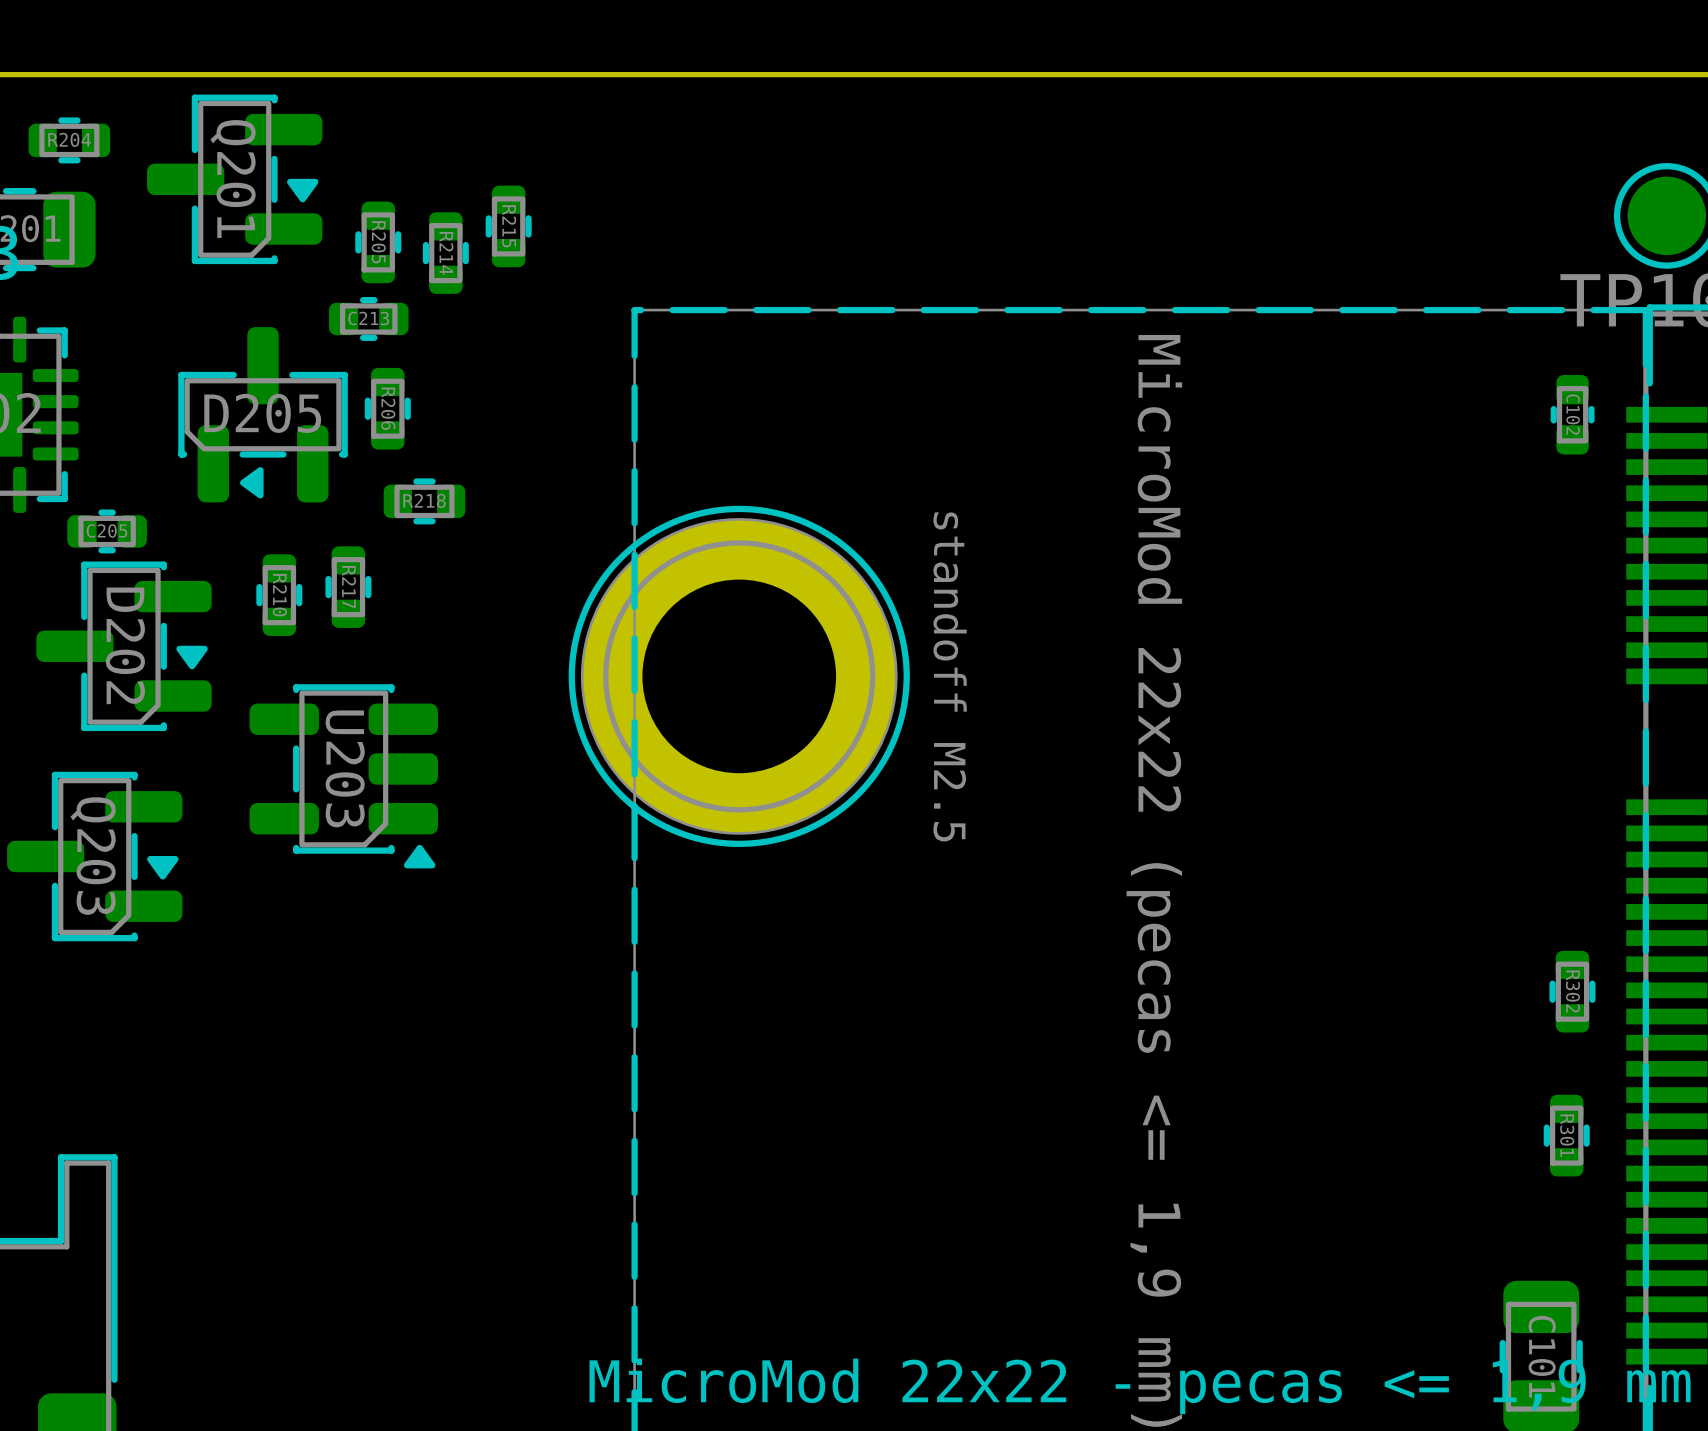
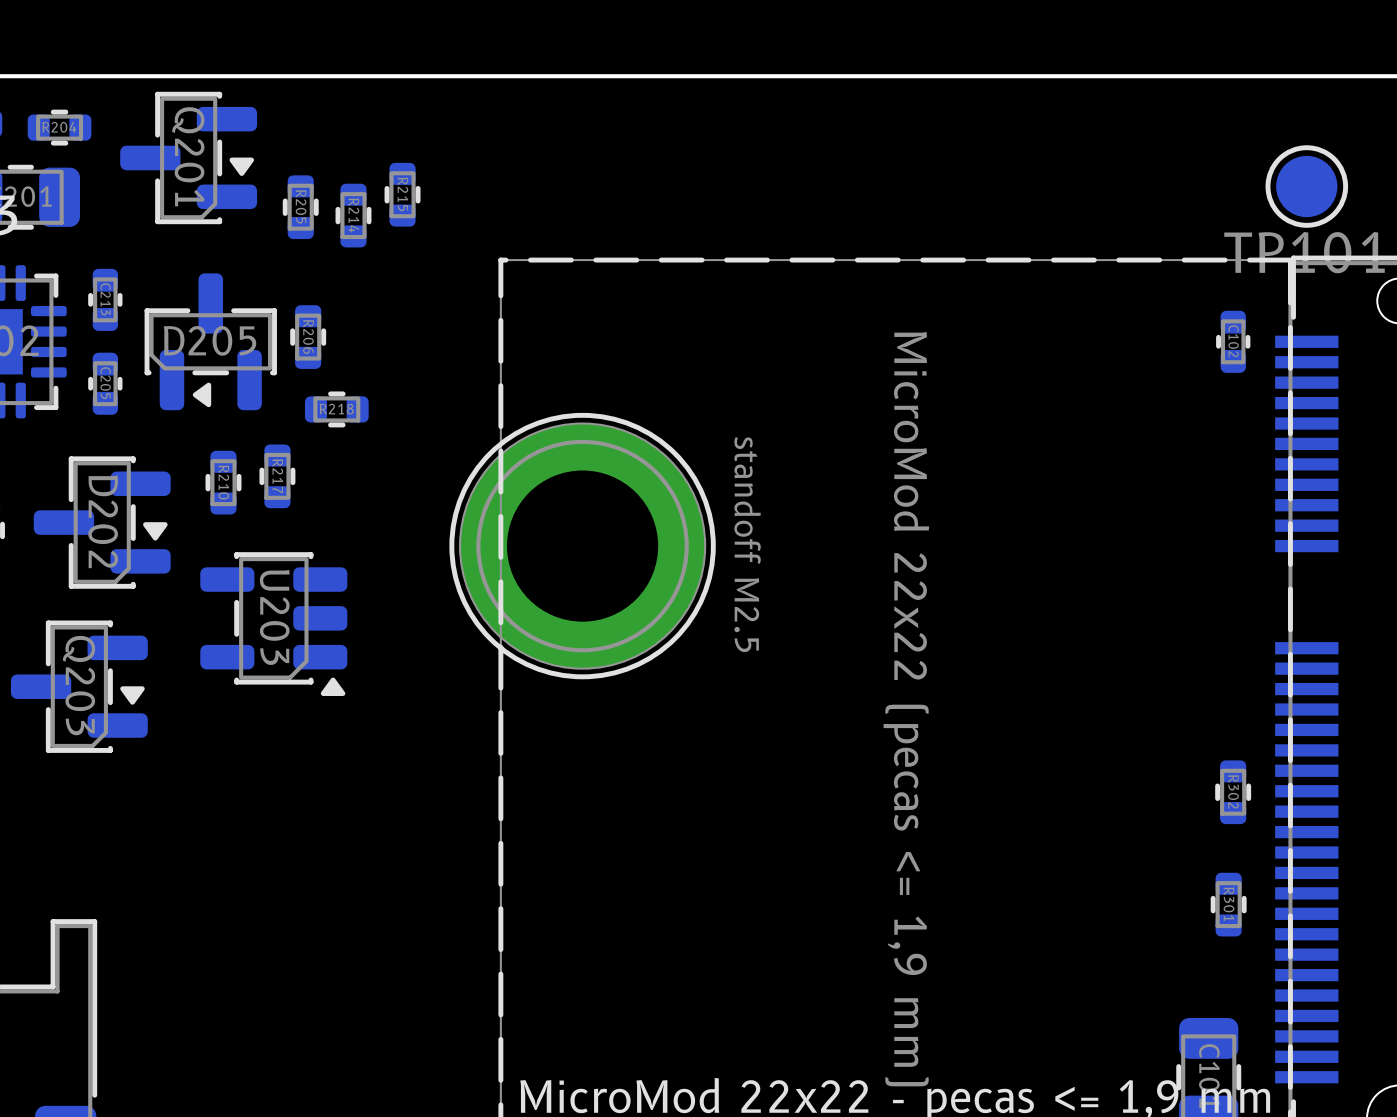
C213 rotation: 0° (368, 318) -> 90° clockwise (105, 299)
C213 position: (368, 318) -> (105, 299)
C205 rotation: 0° (107, 531) -> 90° clockwise (105, 383)
C205 position: (107, 531) -> (105, 383)

